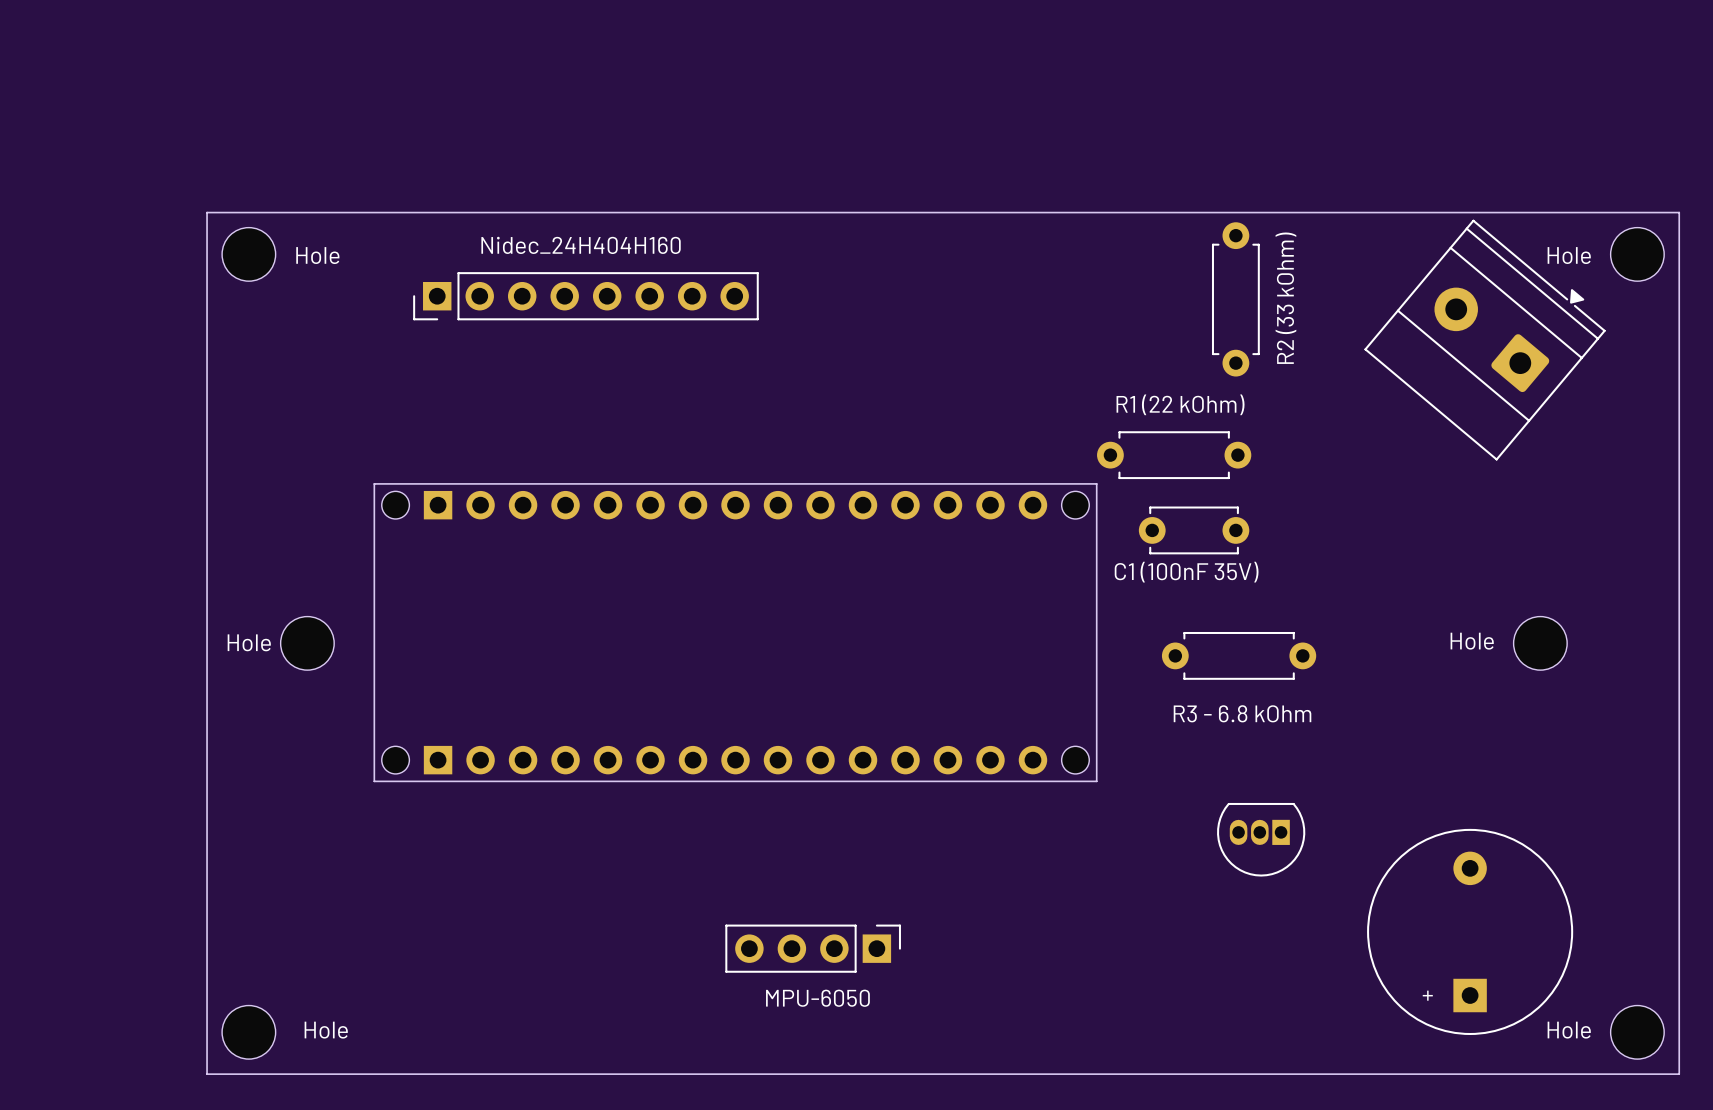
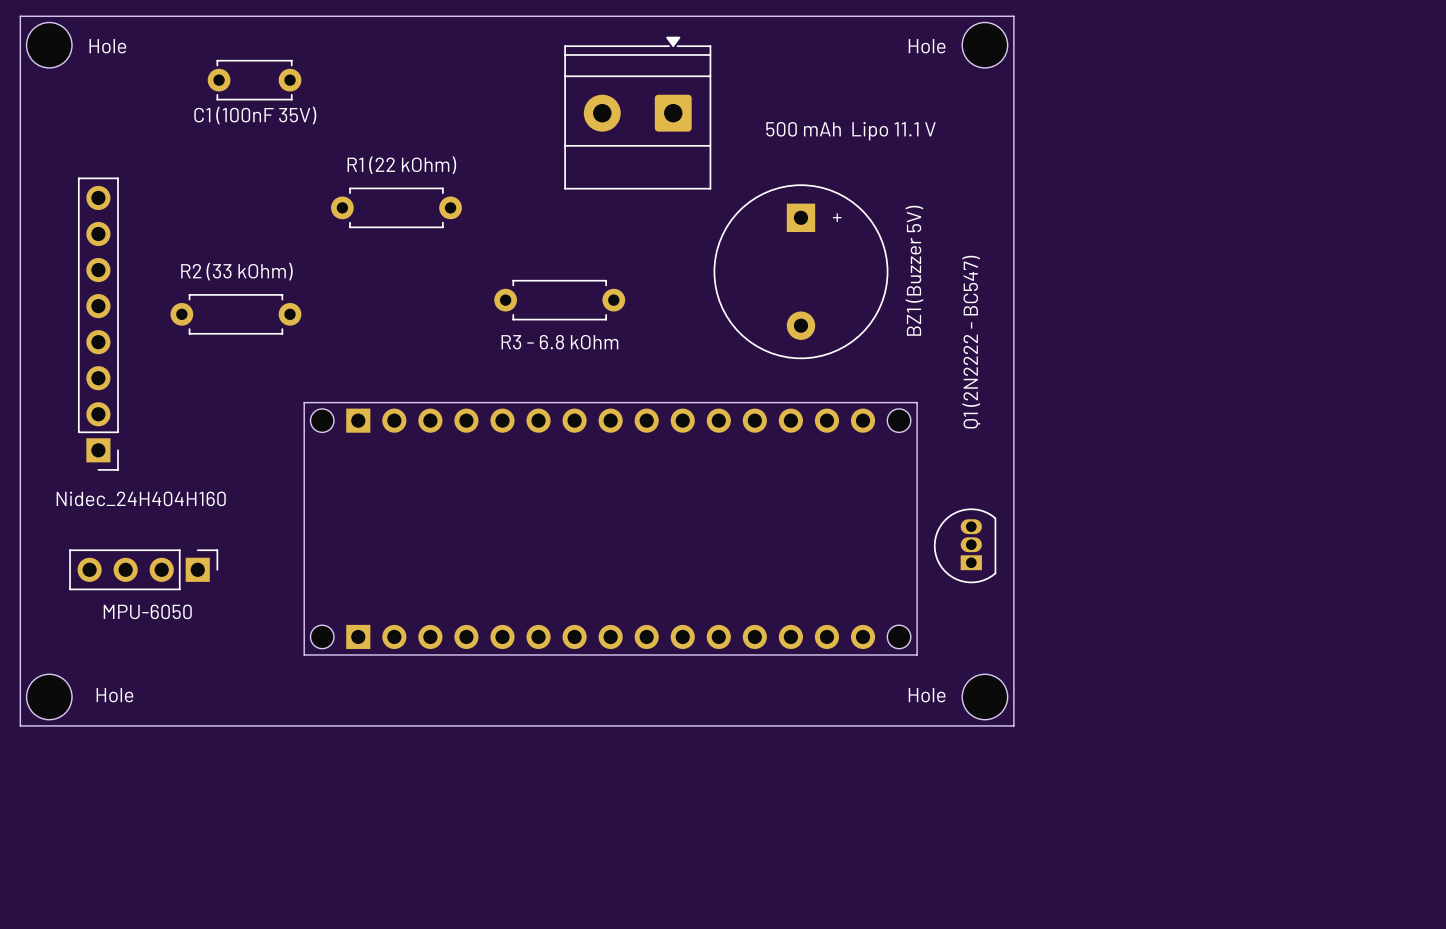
board edge: none -> (20, 16) (1013, 16) (1013, 725) (20, 725) (20, 16)
Hole: none -> (984, 45)
500 mAh Lipo 11.1 V: none -> (637, 113)
board edge: (207, 212) (1679, 212) (1679, 1074) (207, 1074) (207, 212) -> none
Nidec_24H404H160 name position: Nidec_24H404H160 (581, 245) -> Nidec_24H404H160 (141, 498)
Hole position: (248, 254) -> (49, 45)
Hole: (1637, 254) -> none
Nidec_24H404H160 rotation: 0° (585, 296) -> 90° counterclockwise (98, 324)
Nidec_24H404H160 position: (585, 296) -> (98, 324)
R2 (33 kOhm) name position: R2 (33 kOhm) (1285, 298) -> R2 (33 kOhm) (236, 271)
R2 (33 kOhm) rotation: 0° (1235, 299) -> 90° clockwise (235, 314)
R2 (33 kOhm) position: (1235, 299) -> (235, 314)
BZ1 (Buzzer 5V): none -> (800, 271)
part: (1485, 340) -> none
R1 (22 kOhm) position: (1174, 455) -> (396, 207)
C1 (100nF 35V) position: (1194, 530) -> (254, 80)
C1 (100nF 35V) name position: C1 (100nF 35V) (1186, 572) -> C1 (100nF 35V) (255, 115)
Hole: (307, 643) -> none
Hole: (1540, 643) -> none
Q1 (2N2222 - BC547): none -> (965, 545)
R3 - 6.8 kOhm position: (1239, 655) -> (559, 300)
R3 - 6.8 kOhm name position: R3 - 6.8 kOhm (1242, 713) -> R3 - 6.8 kOhm (559, 342)
Hole: none -> (49, 696)
Hole: none -> (984, 696)
part: (1261, 839) -> none
part: (1470, 931) -> none
MPU-6050 position: (813, 948) -> (143, 569)
Hole: (248, 1032) -> none
Hole: (1637, 1032) -> none

